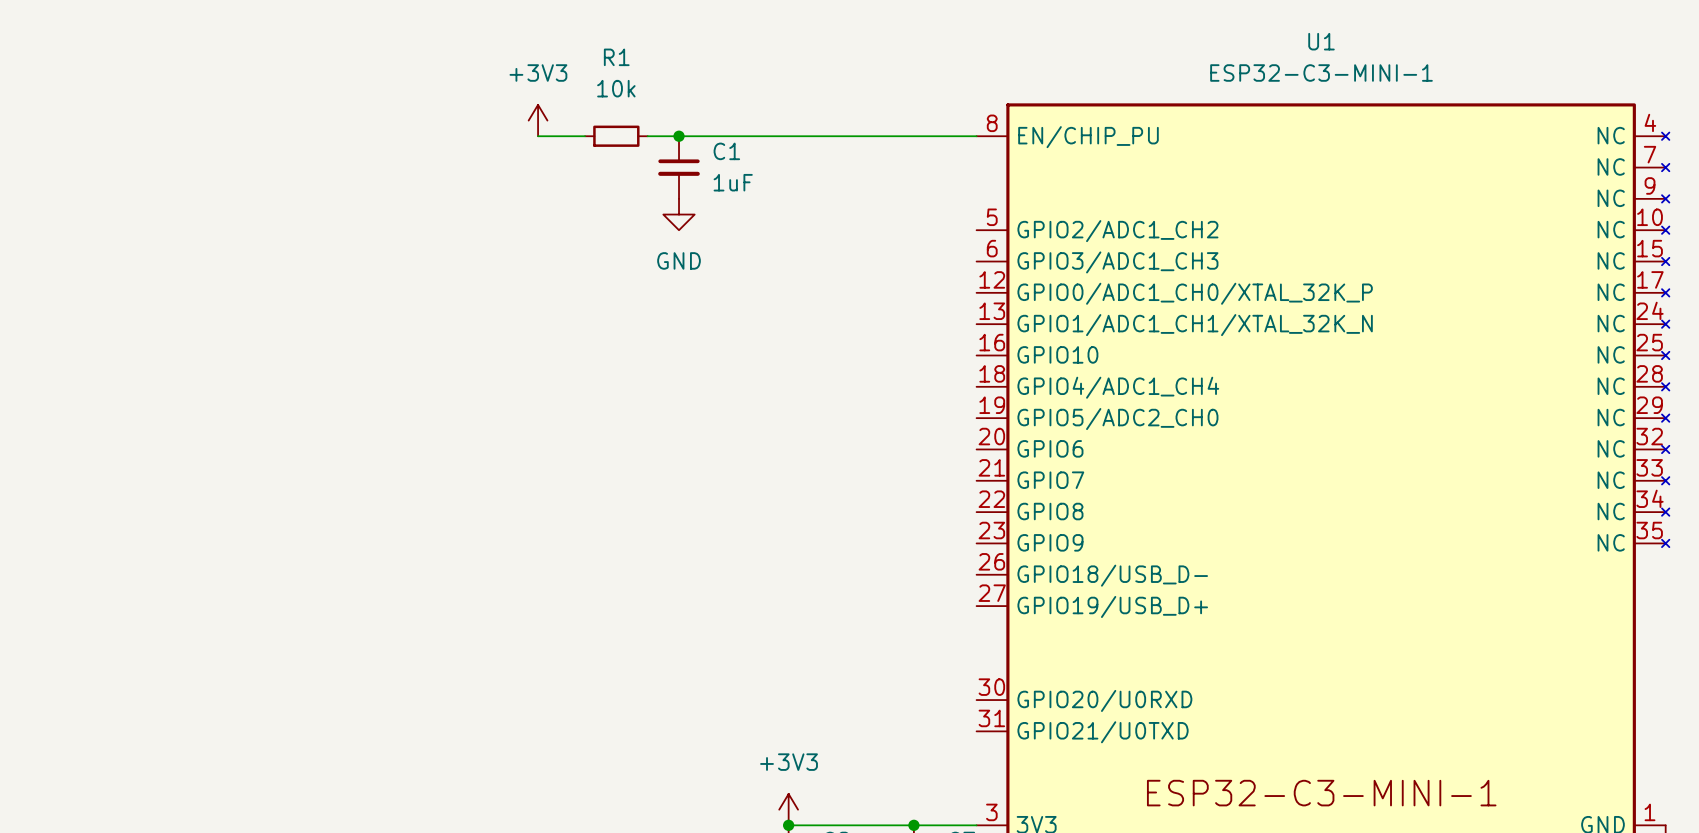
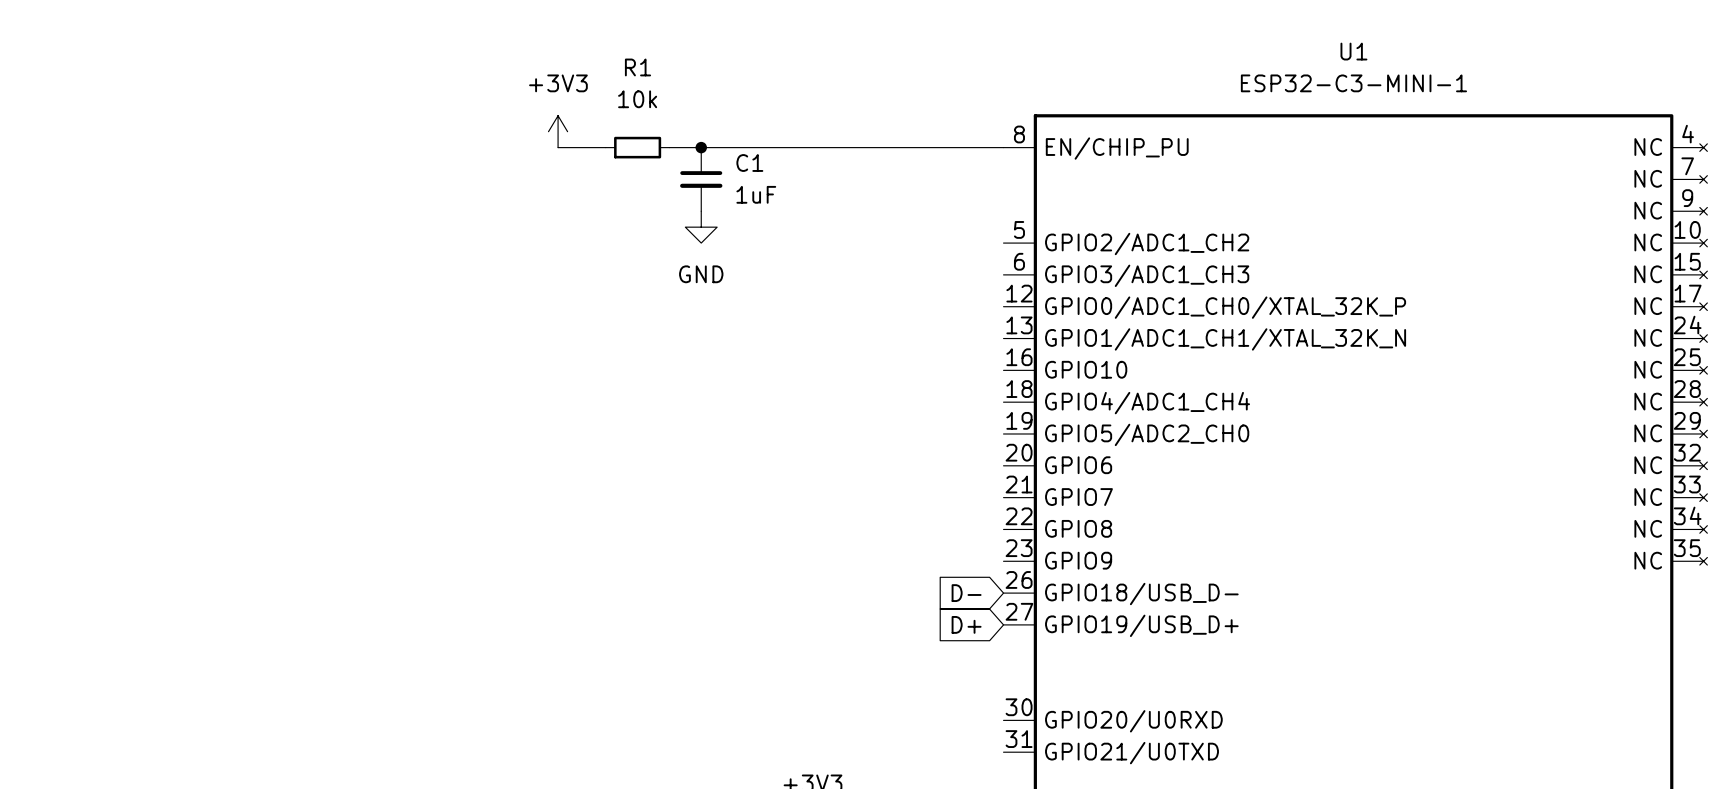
global label: none -> D- (966, 593)
global label: none -> D+ (966, 624)

